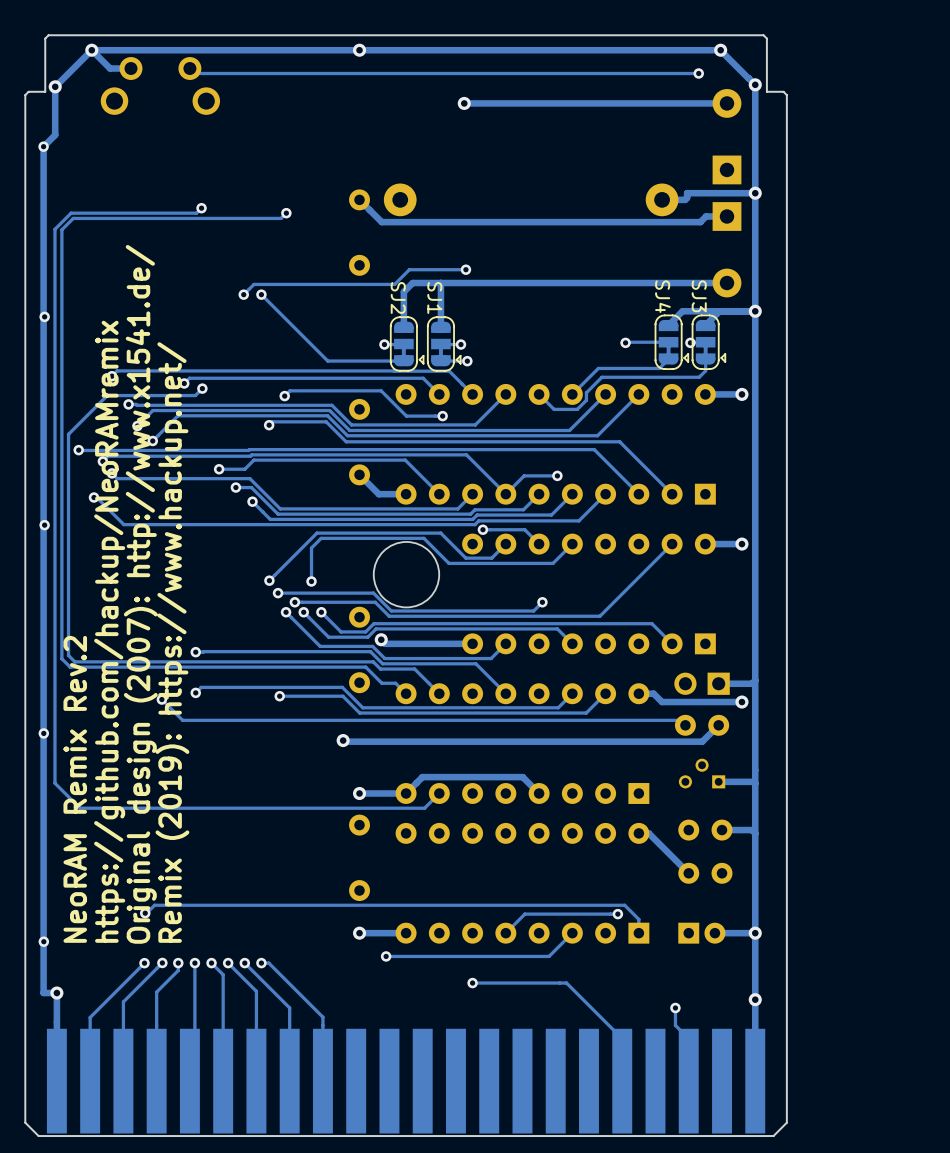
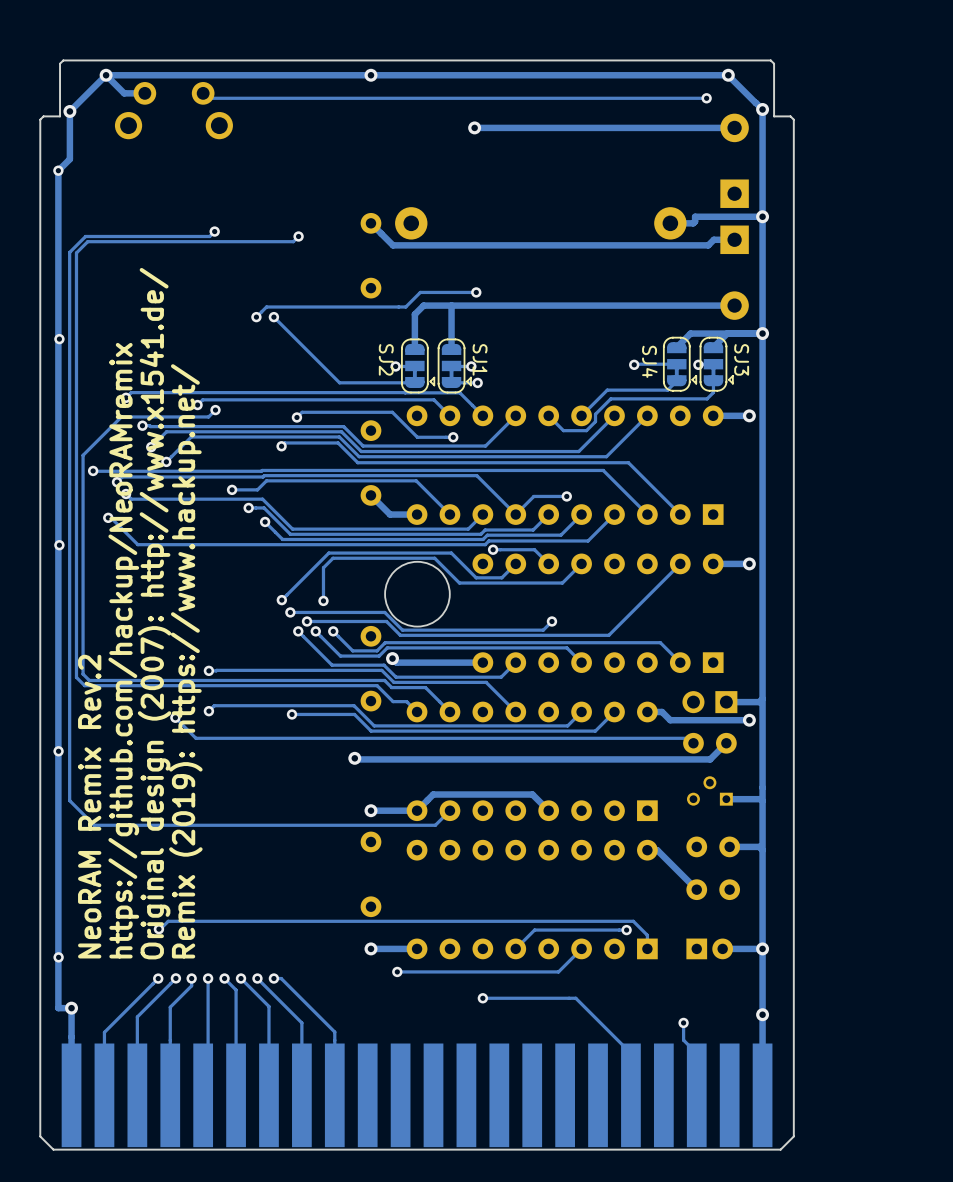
SJ4 name position: SJ4 (662, 296) -> SJ4 (649, 361)
SJ3 name position: SJ3 (699, 296) -> SJ3 (741, 359)
SJ2 name position: SJ2 (398, 297) -> SJ2 (386, 359)
SJ1 name position: SJ1 (434, 297) -> SJ1 (480, 359)

